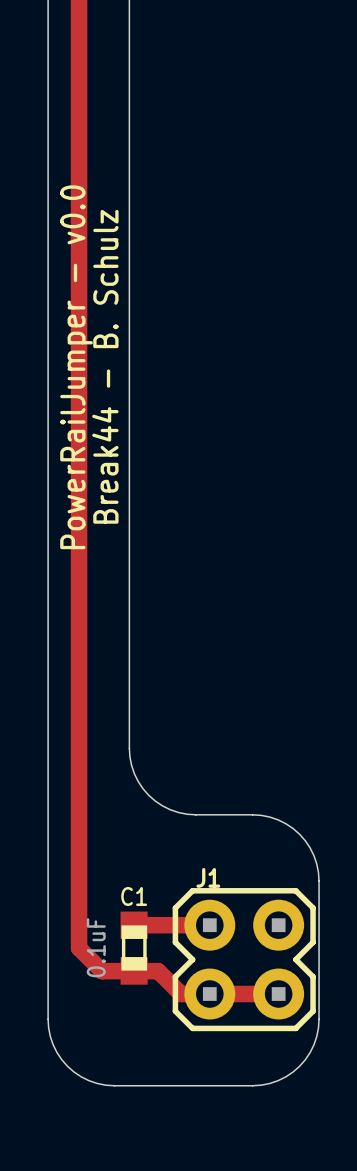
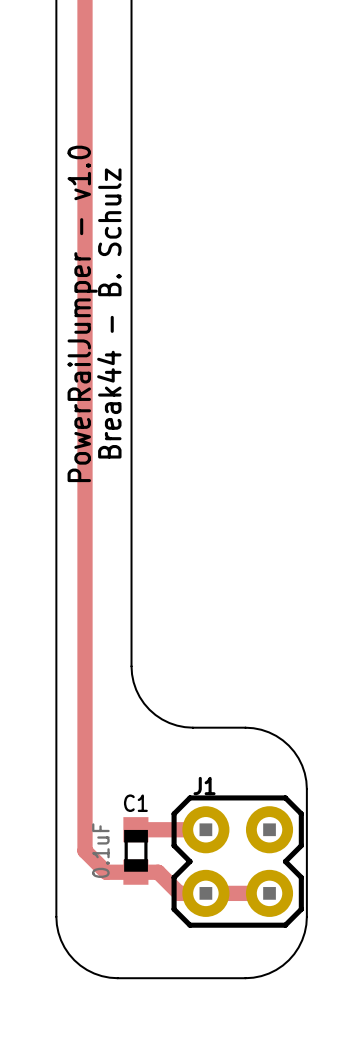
text: PowerRailJumper - v0.0 (76, 367) -> PowerRailJumper - v1.0 (82, 313)

